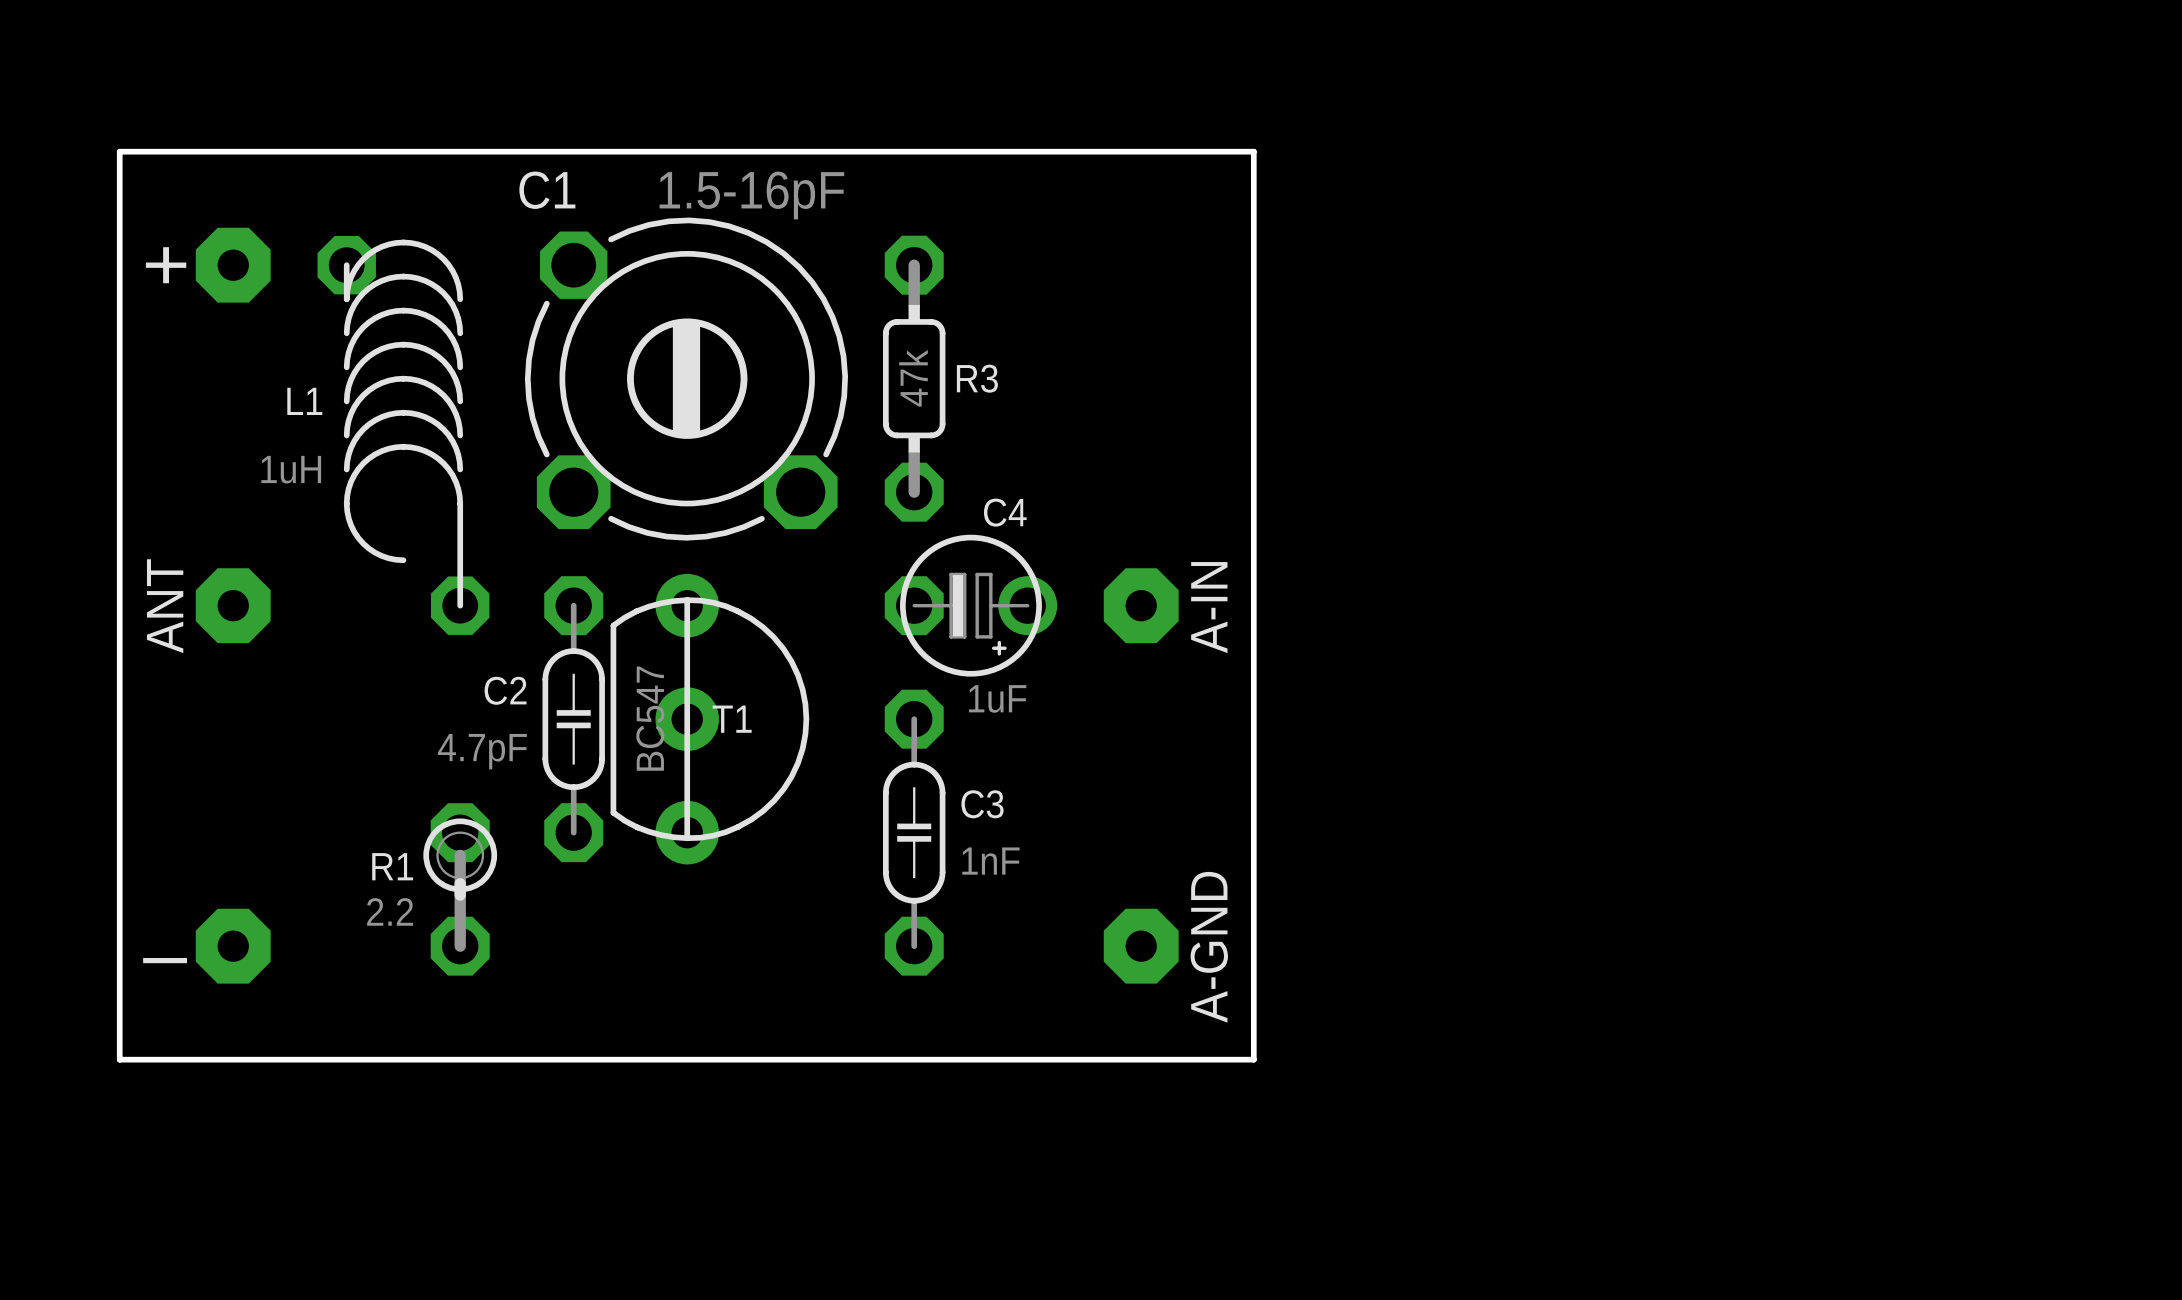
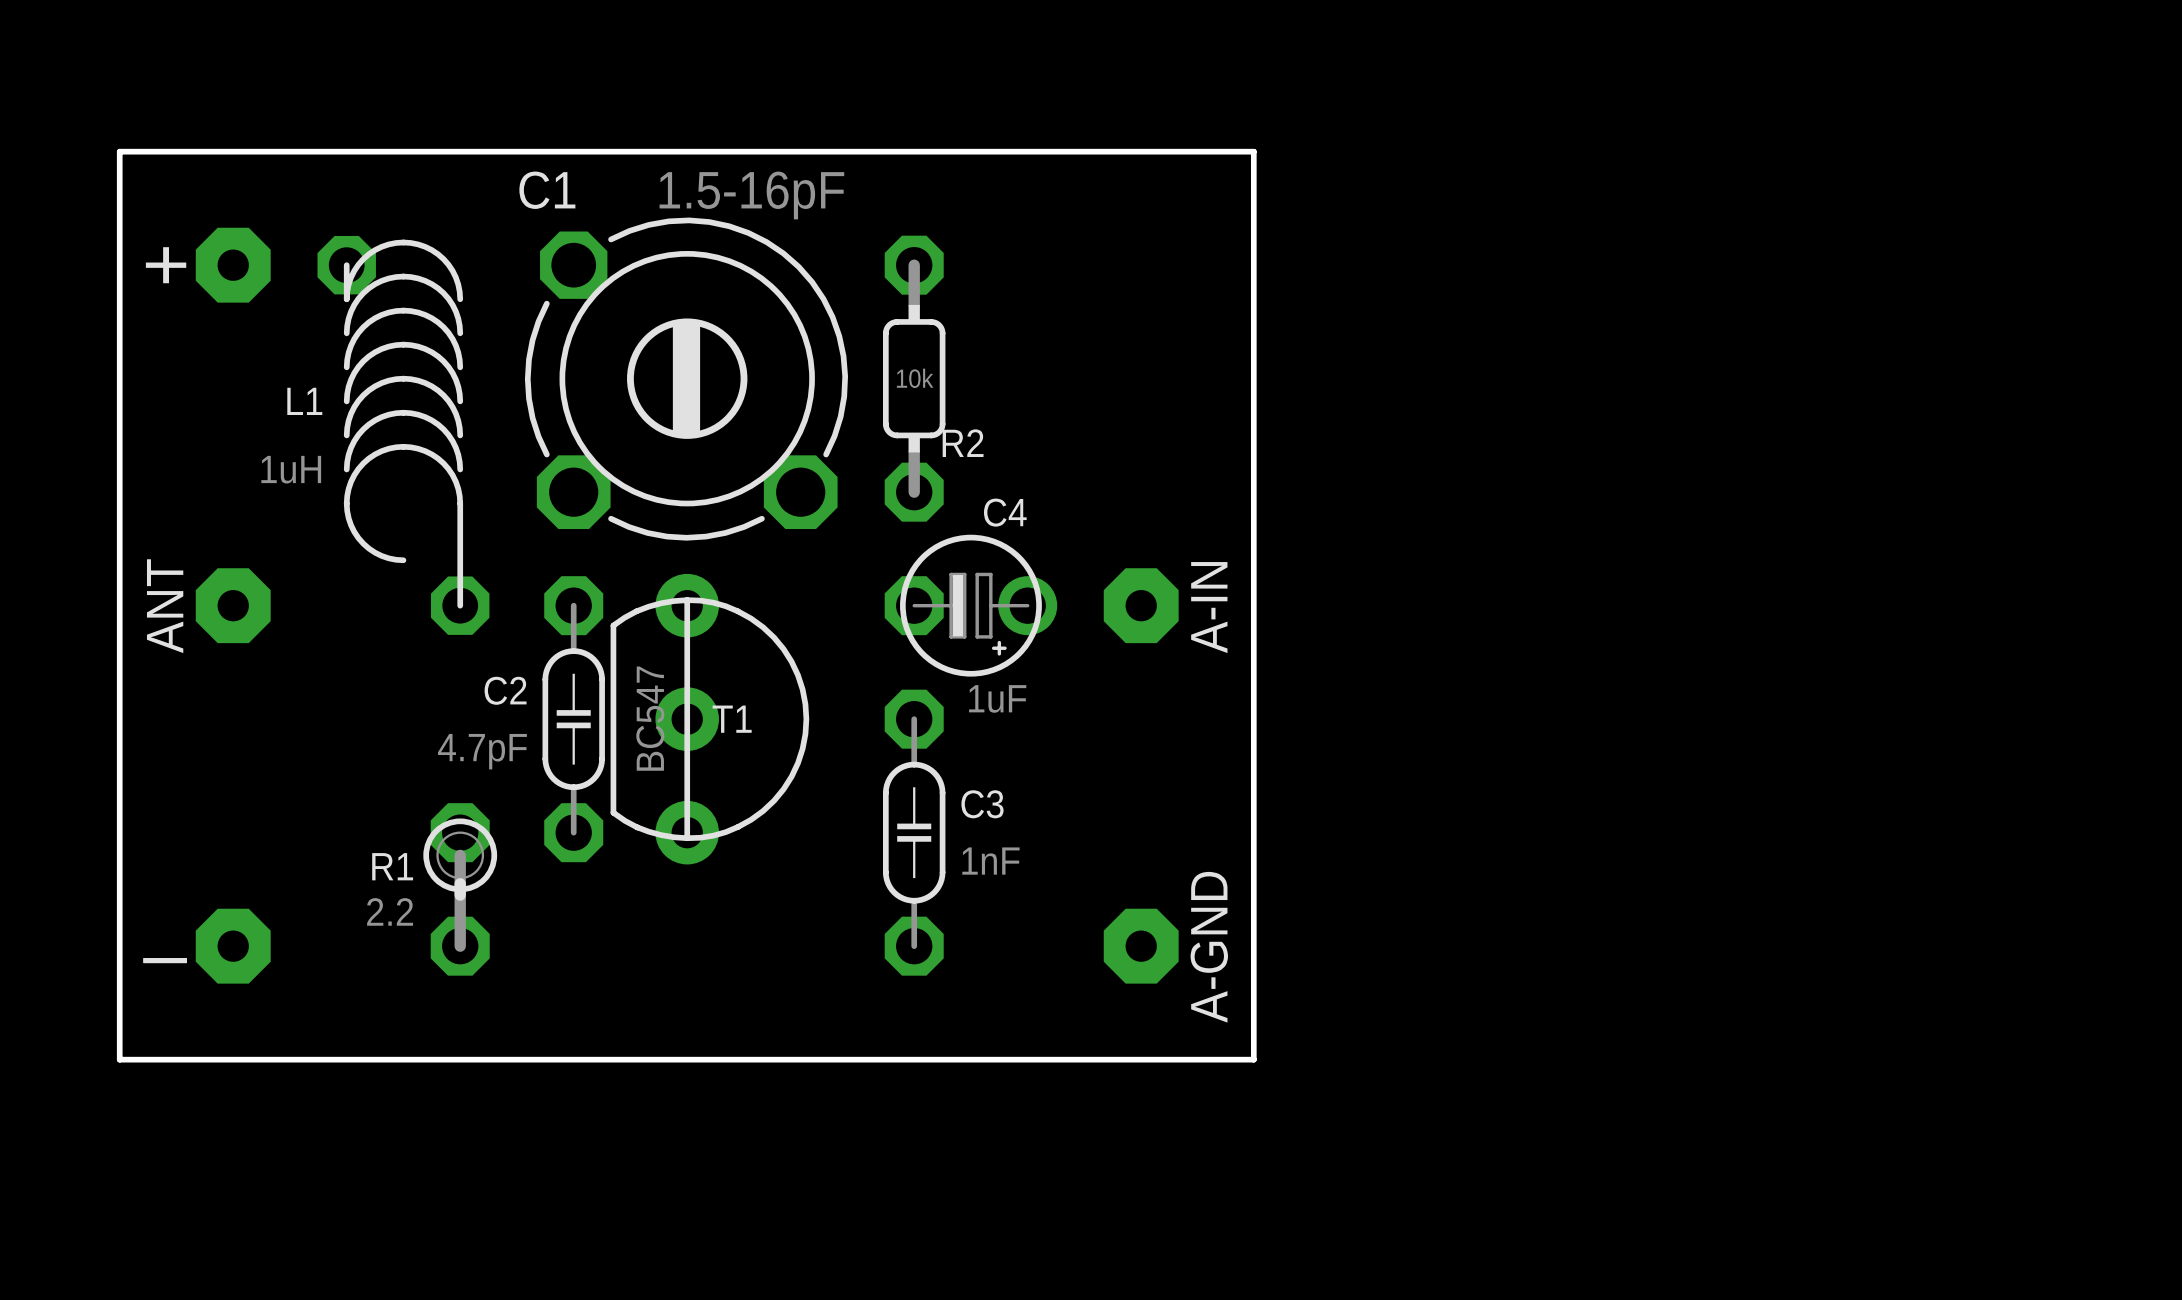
R3 value: 47k (913, 378) -> 10k (915, 378)
R3 name: R3 (977, 378) -> R2 (963, 443)

